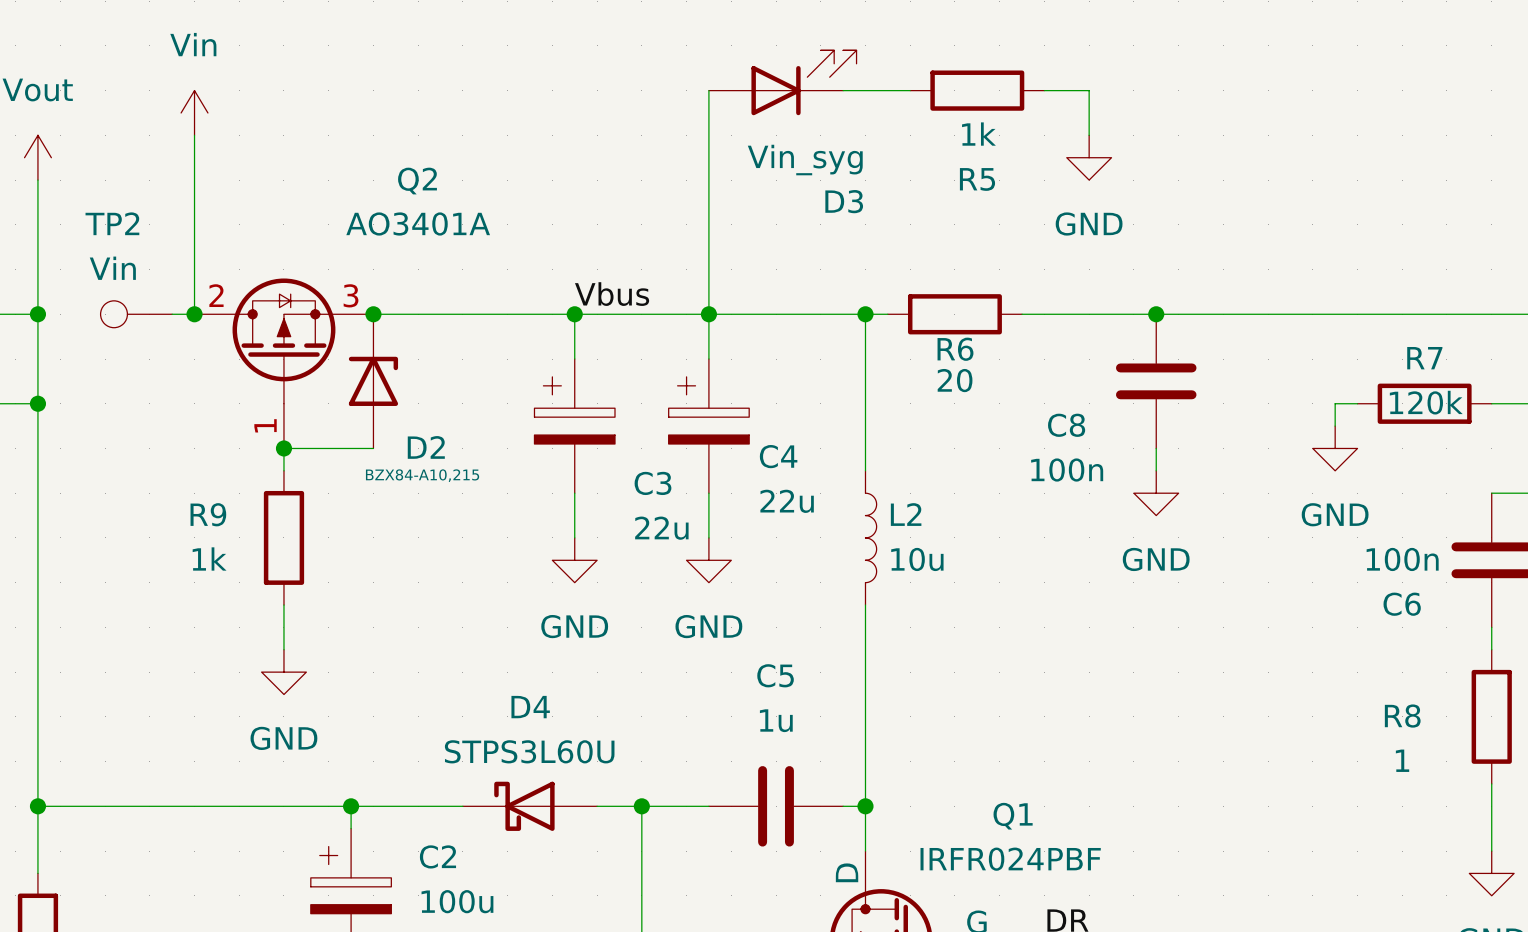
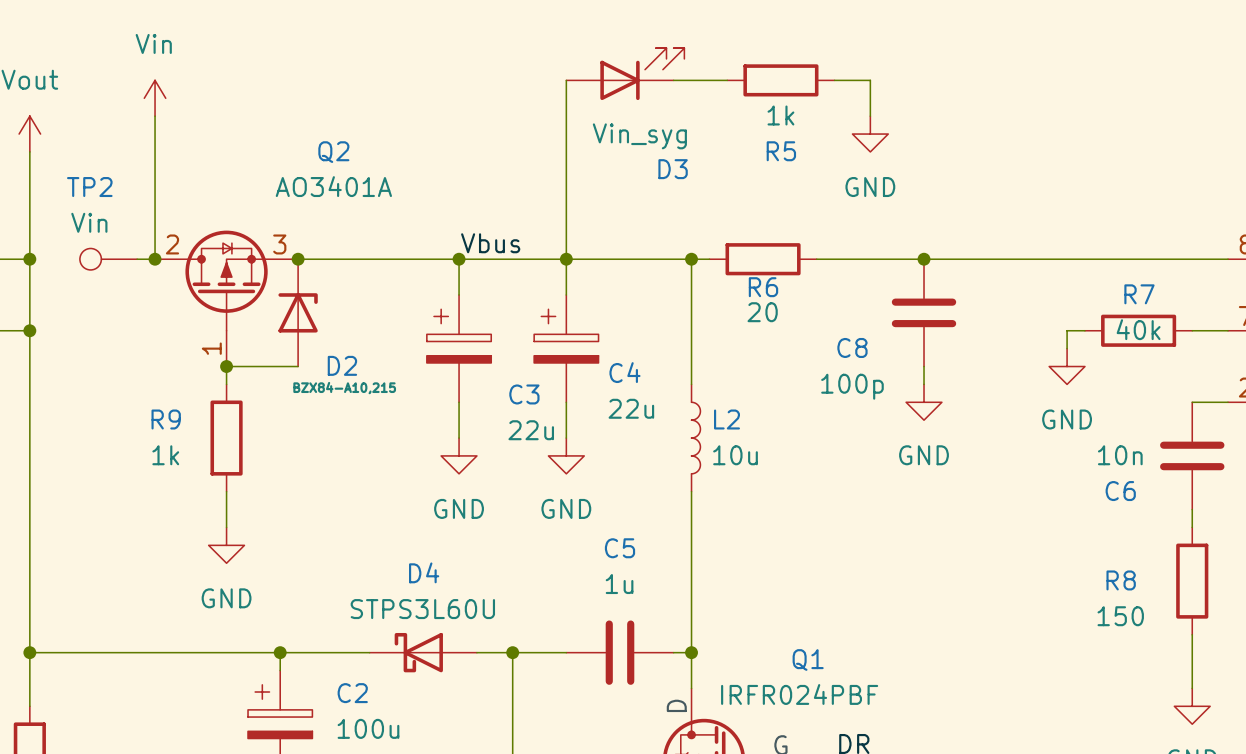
R7 value: 120k (1426, 402) -> 40k (1138, 329)
C8 value: 100n (1067, 470) -> 100p (852, 386)
C6 value: 100n (1402, 559) -> 10n (1120, 455)
R8 value: 1 (1402, 760) -> 150 (1120, 616)

